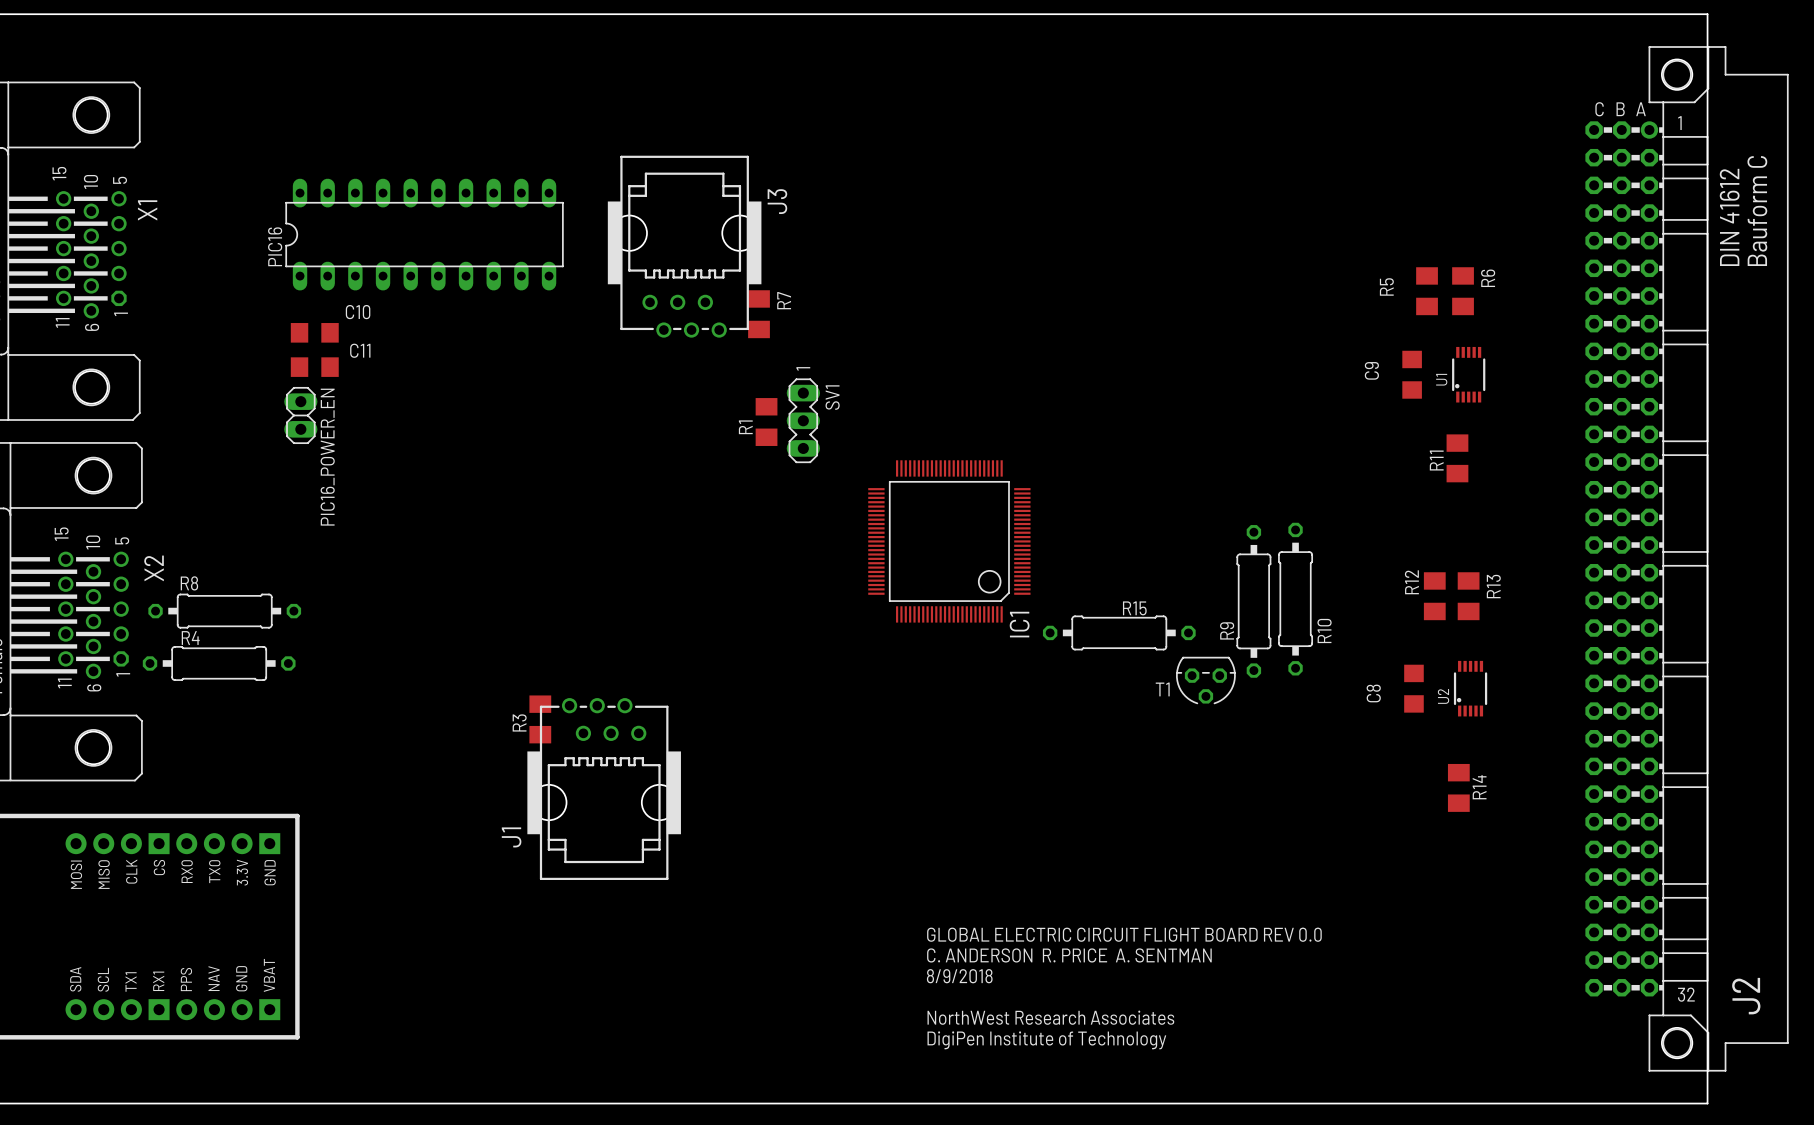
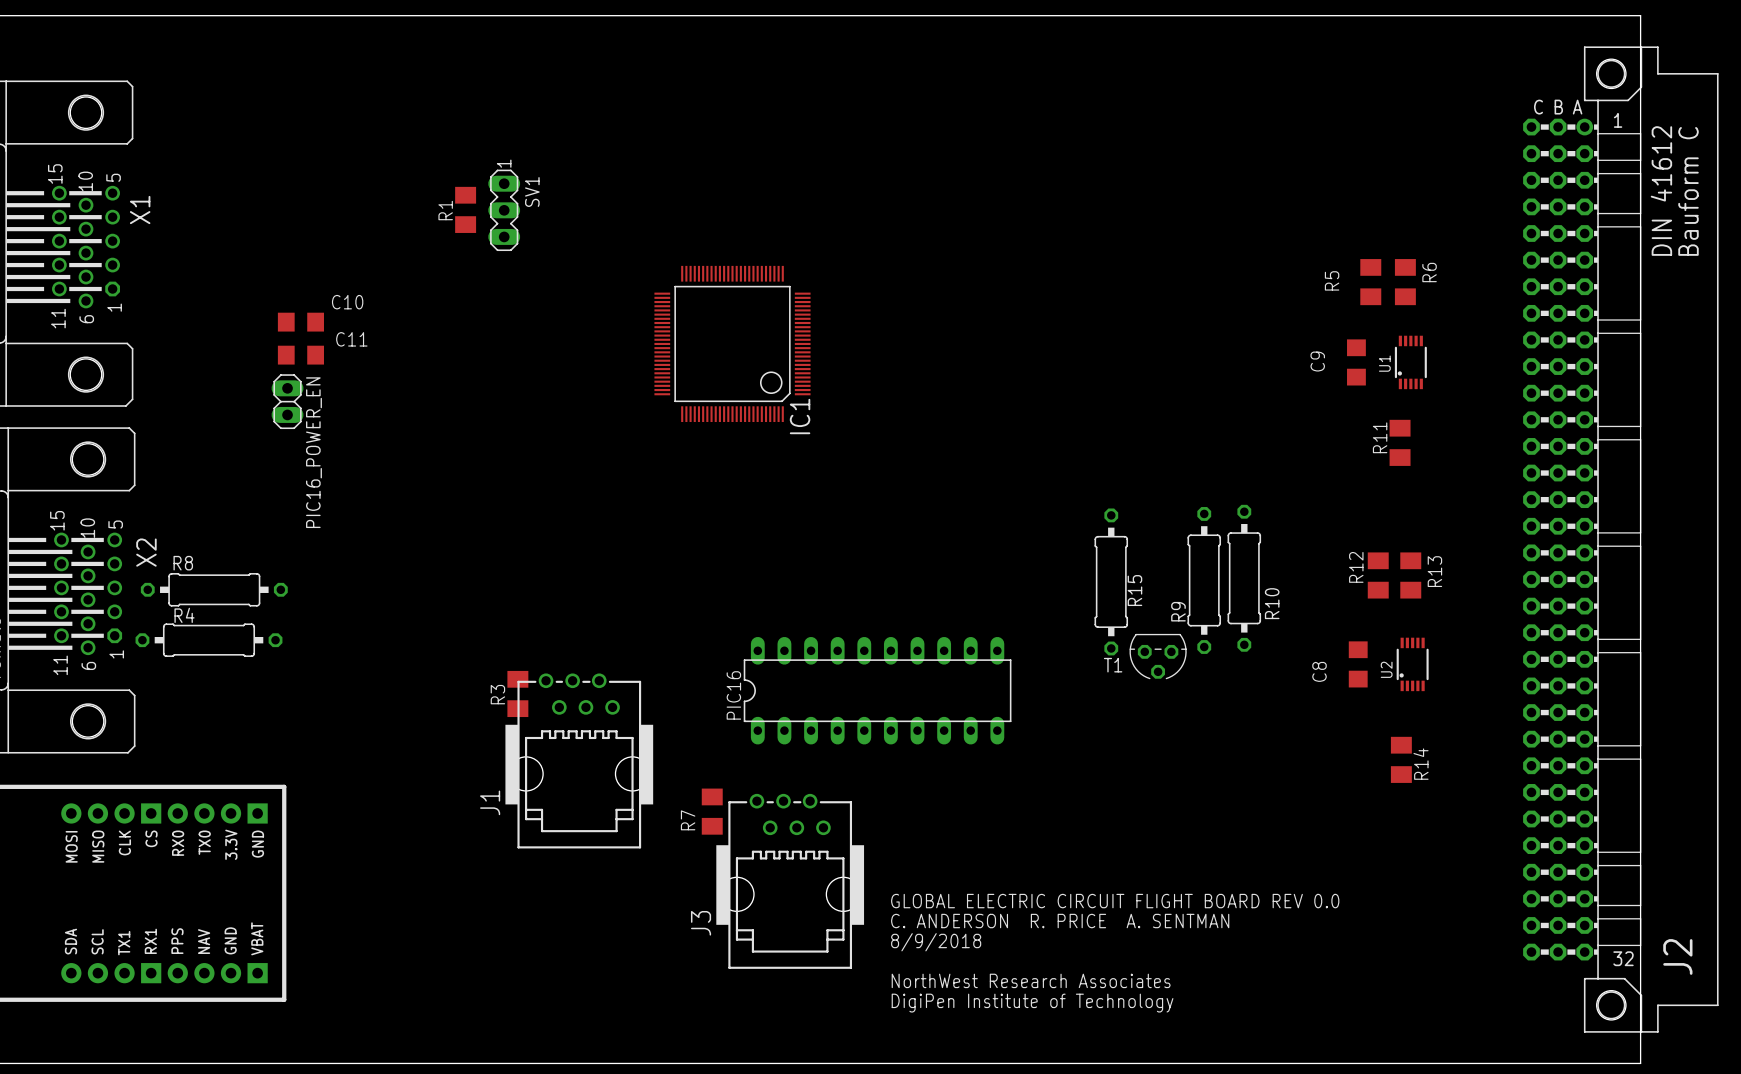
PIC16 position: (424, 234) -> (877, 690)
J3 rotation: 0° (684, 246) -> 180° (790, 881)
J3 position: (684, 246) -> (790, 881)
R7 name position: R7 (784, 300) -> R7 (688, 820)
R7 position: (759, 314) -> (712, 811)
SV1 position: (803, 420) -> (504, 210)
R1 position: (766, 422) -> (465, 209)
IC1 position: (949, 541) -> (732, 343)
R15 rotation: 0° (1119, 632) -> 90° clockwise (1111, 581)

